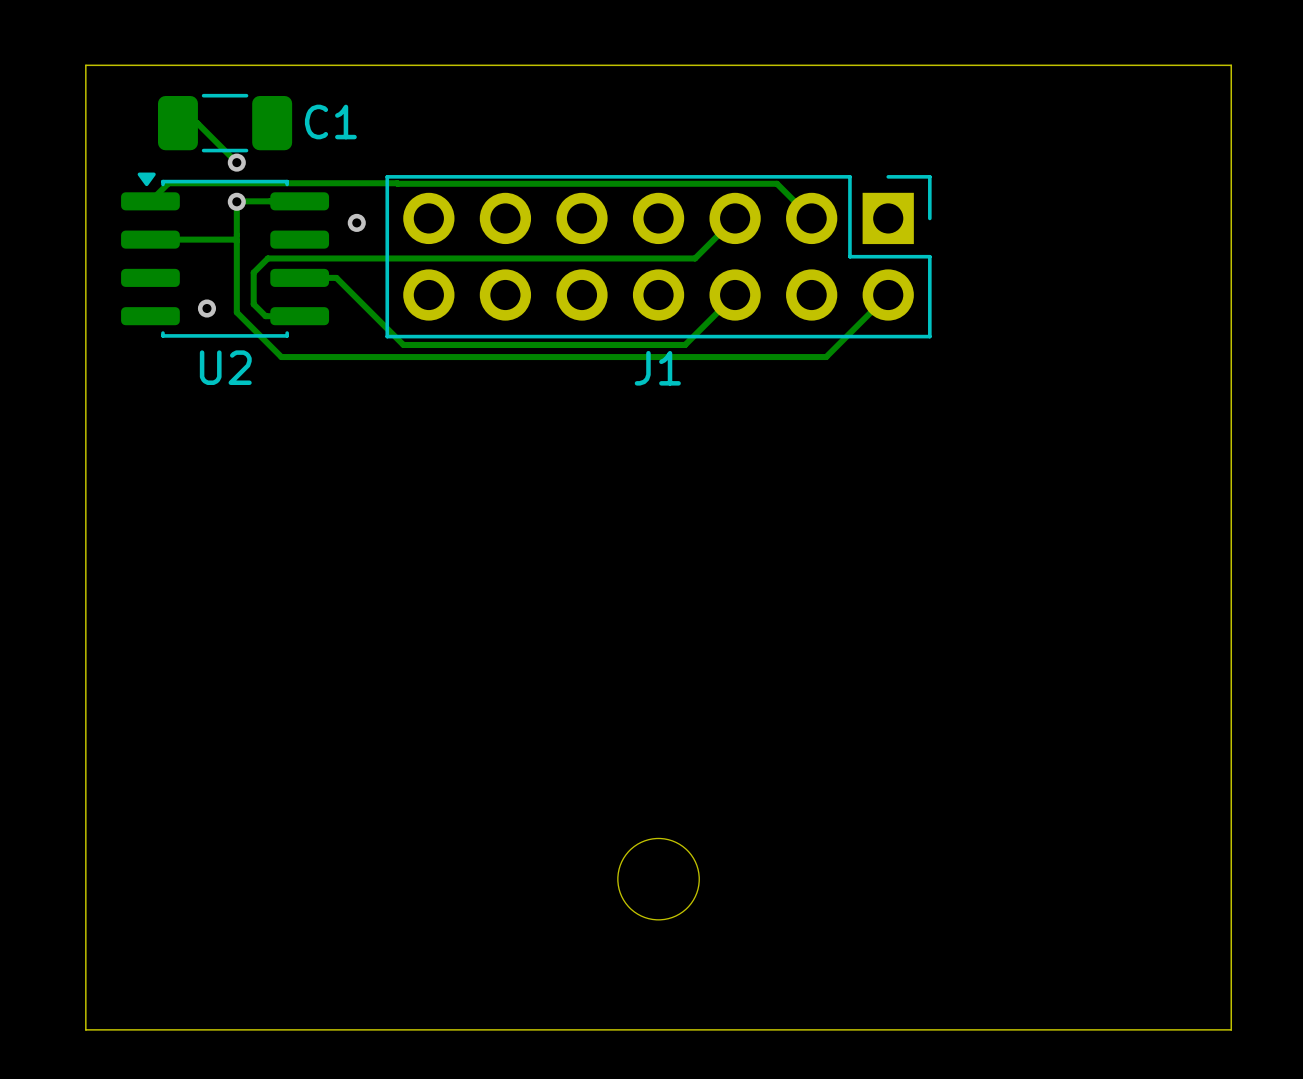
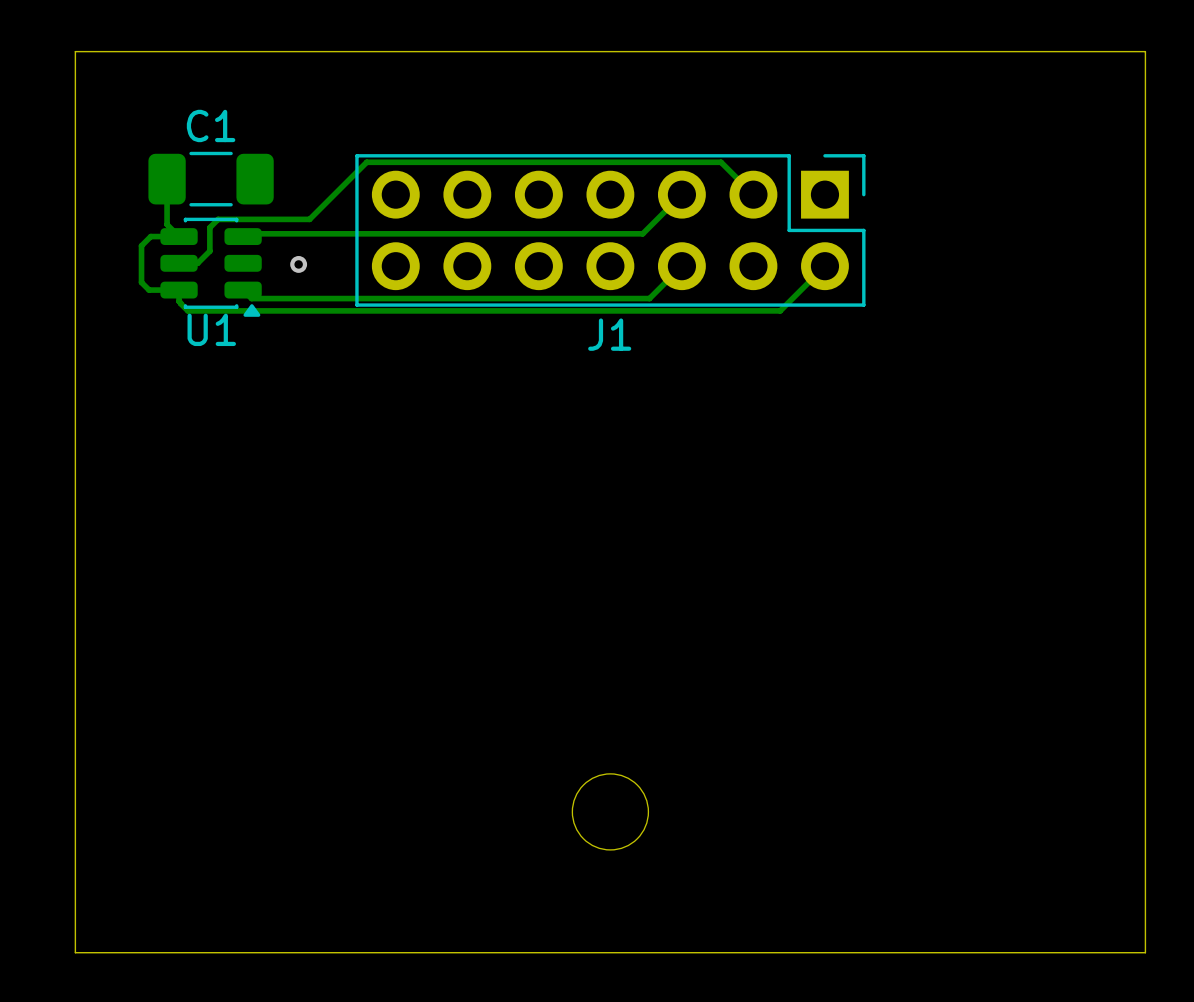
C1 name position: C1 (330, 122) -> C1 (211, 125)
track: (177, 123) (197, 123) (236, 162) -> none
C1 position: (225, 123) -> (211, 179)
via: (236, 162) -> none
track: (397, 183) (168, 183) (150, 201) -> (366, 162) (309, 219) (218, 219) (209, 227) (209, 251) (197, 263) (179, 263)
track: none -> (167, 179) (167, 224) (179, 236) (150, 236) (141, 245) (141, 282) (149, 290) (179, 290) (180, 303)
via: (236, 201) -> none
track: (299, 201) (236, 201) (236, 312) (281, 357) (826, 357) (840, 342) -> (180, 303) (187, 310) (780, 310)
via: (356, 222) -> none
track: (150, 239) (236, 240) -> none
U2: (225, 255) -> none
track: (695, 258) (267, 258) (253, 272) (253, 304) (265, 316) (299, 316) -> (644, 232) (642, 233) (245, 233) (243, 236)
track: (299, 277) (336, 277) (403, 344) (685, 344) (700, 329) -> (243, 290) (251, 298) (649, 298)
via: none -> (298, 264)
U1: none -> (211, 267)
via: (206, 308) -> none

